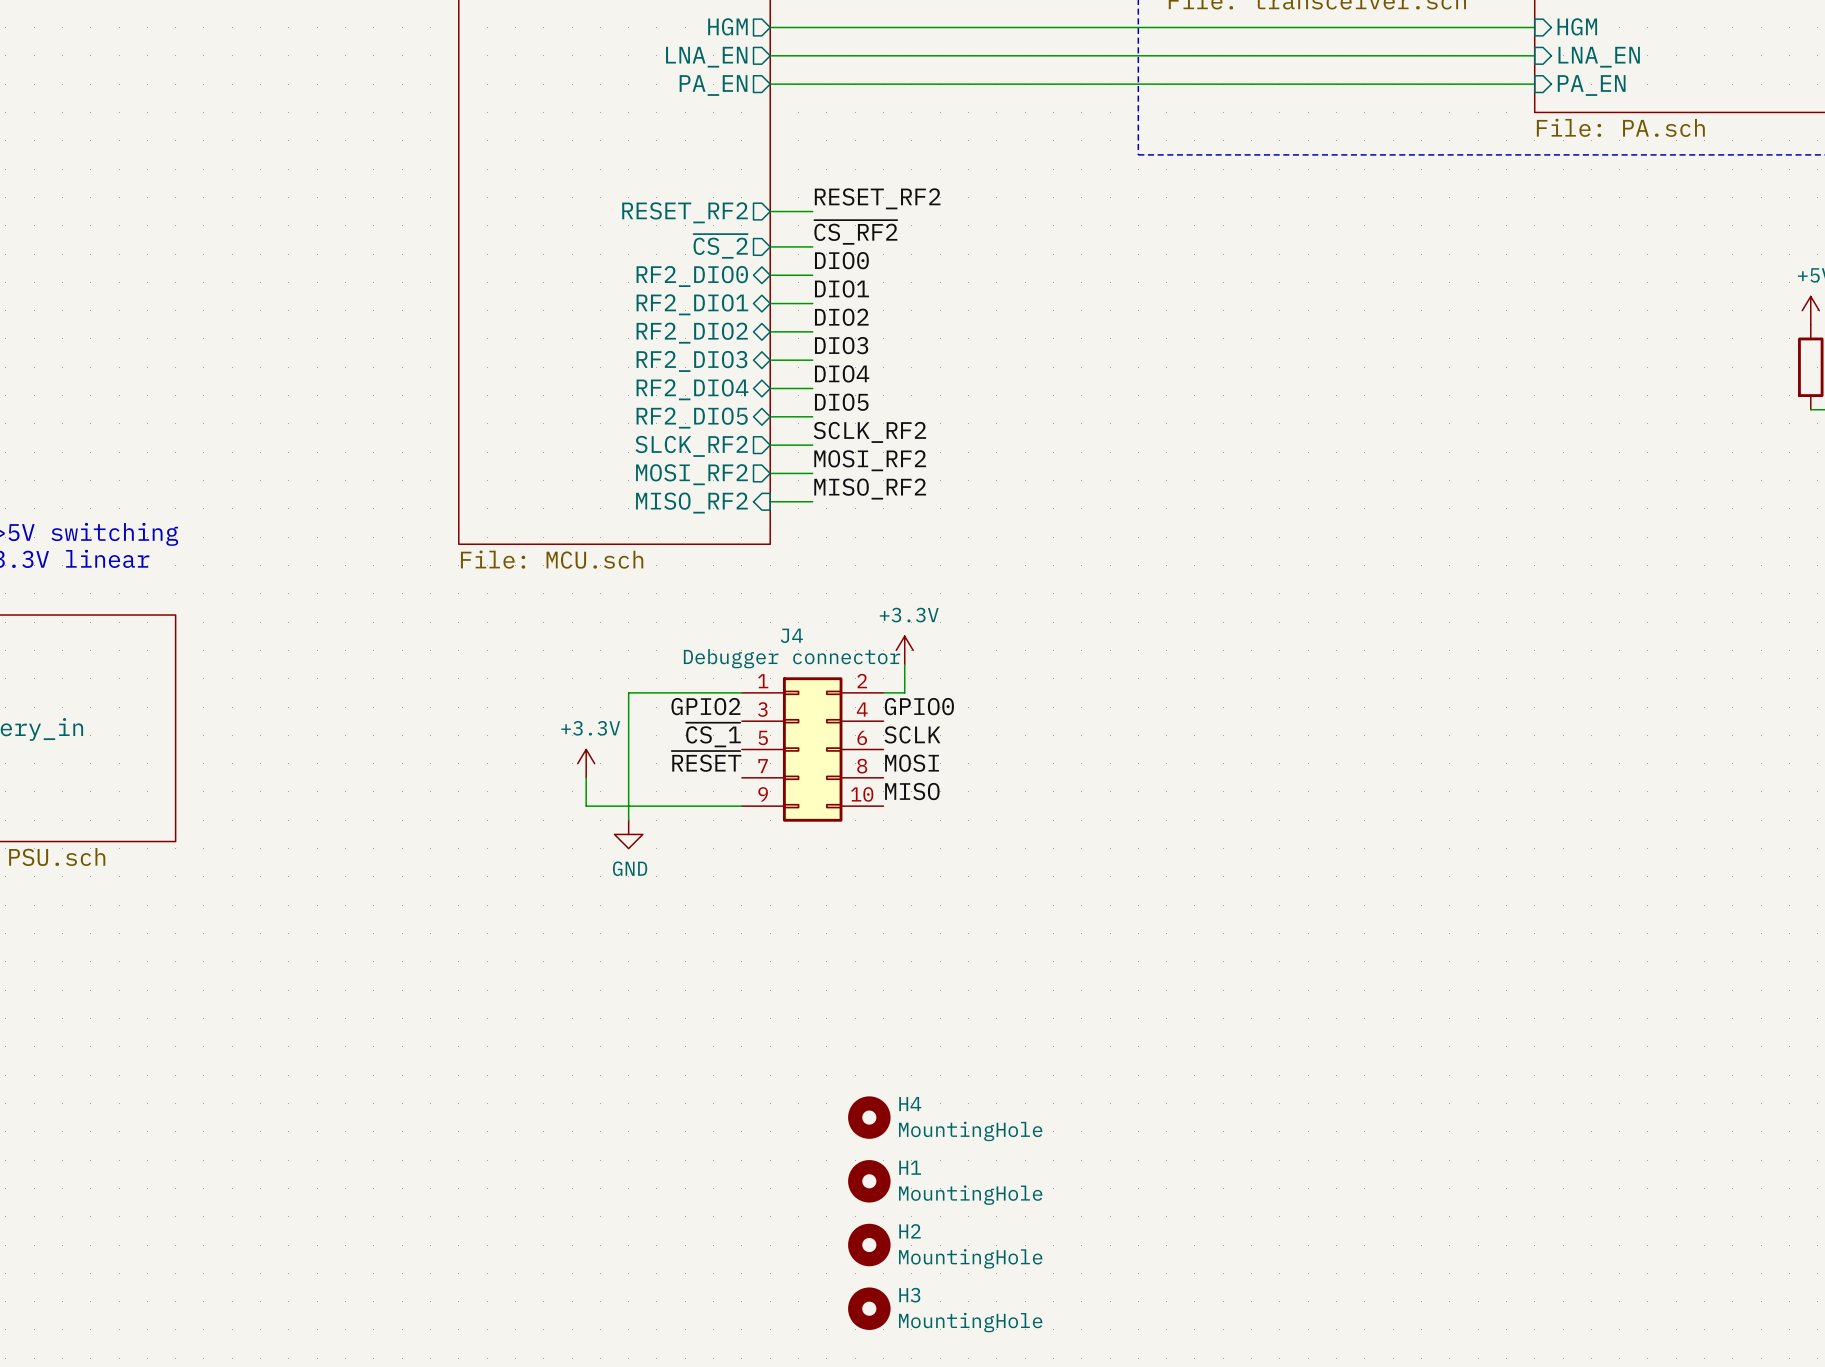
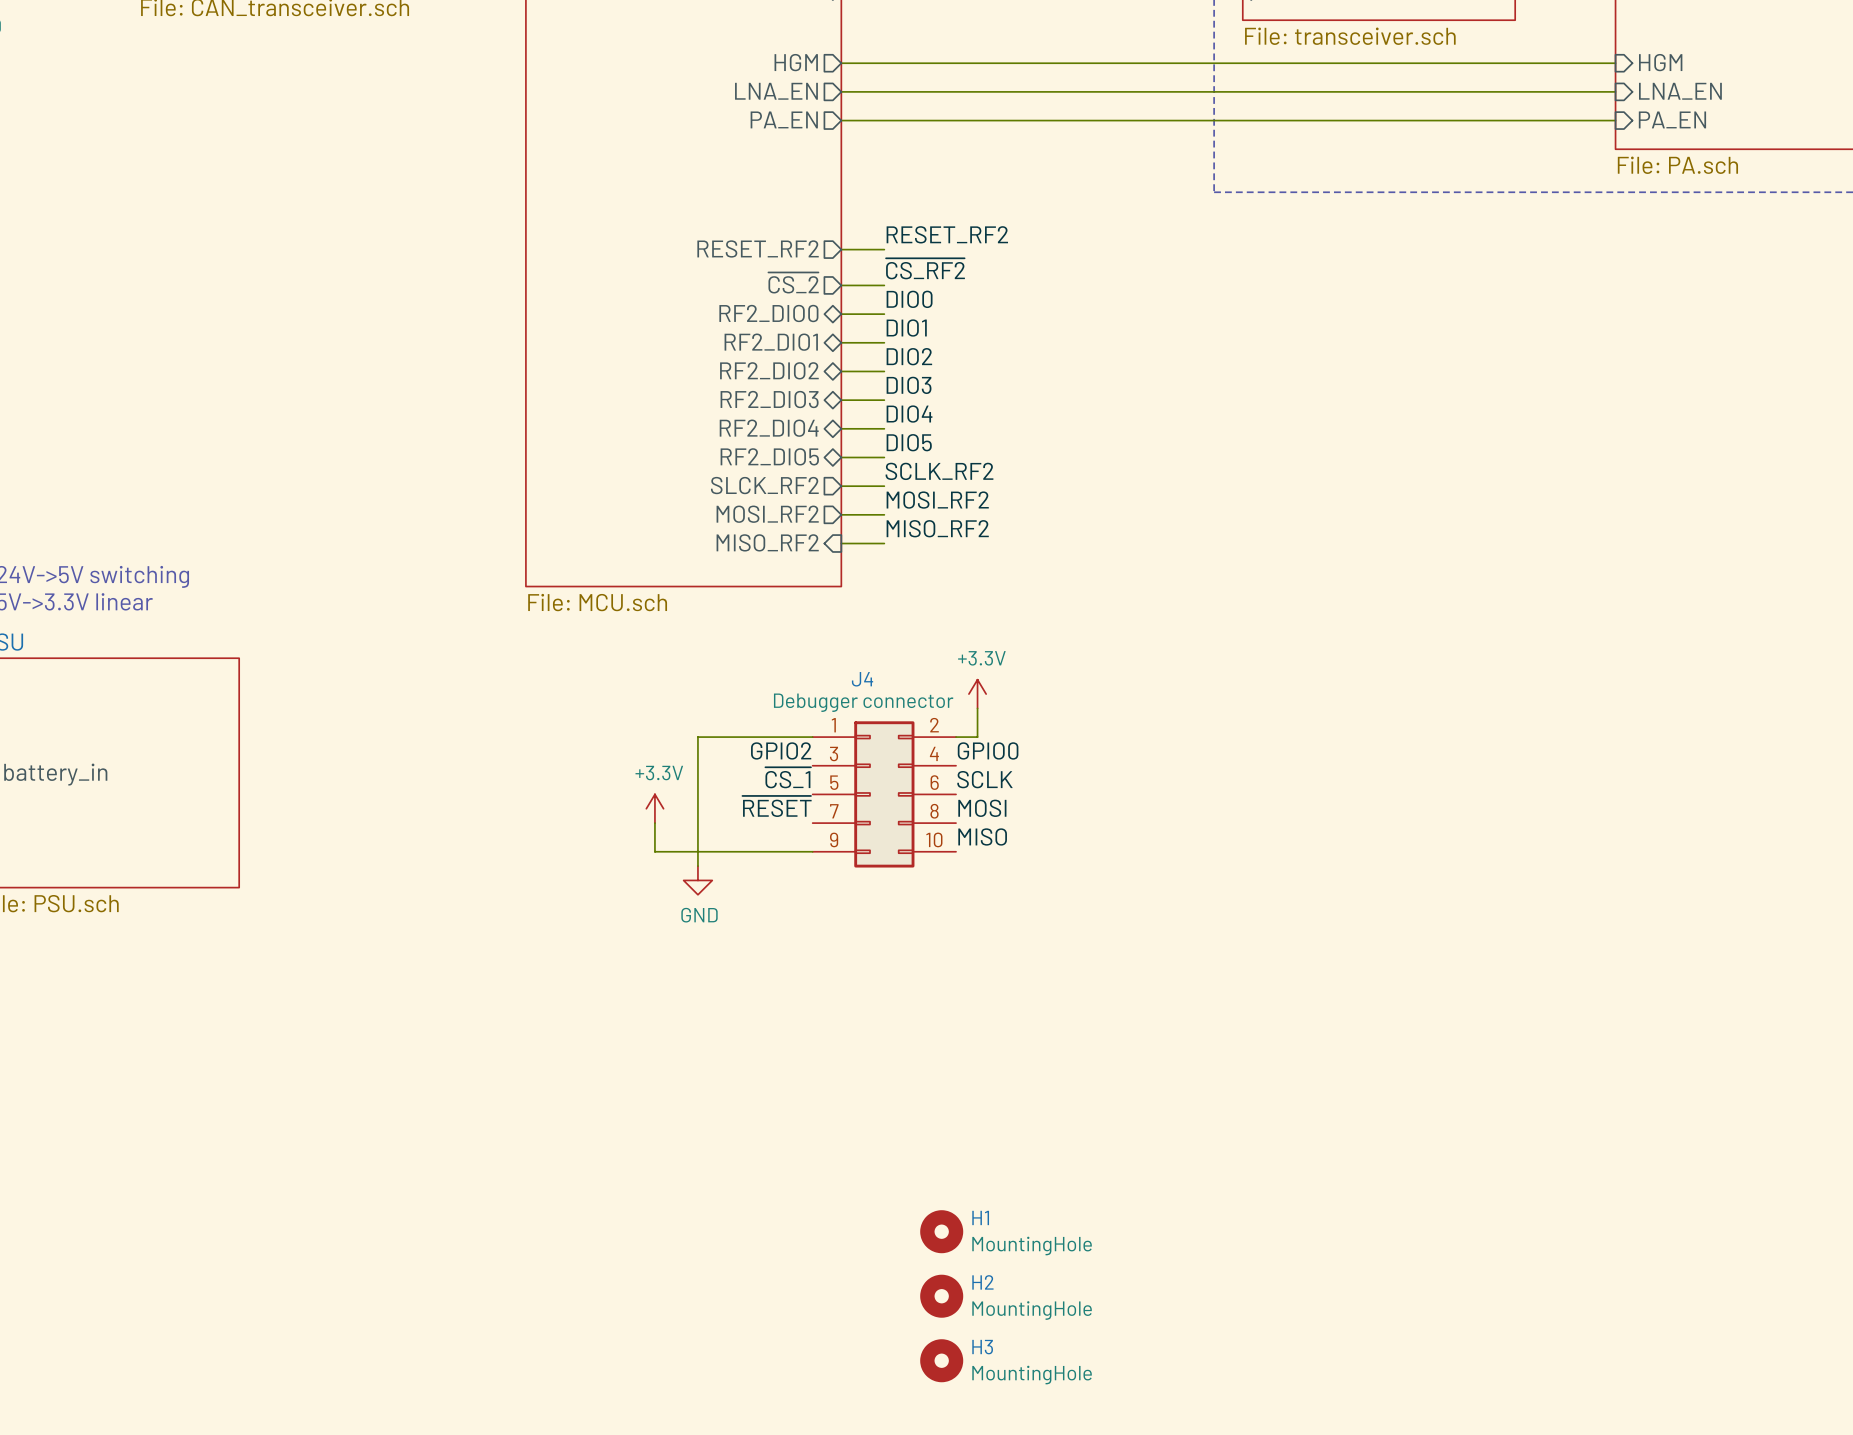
H4: MountingHole (869, 1117) -> none

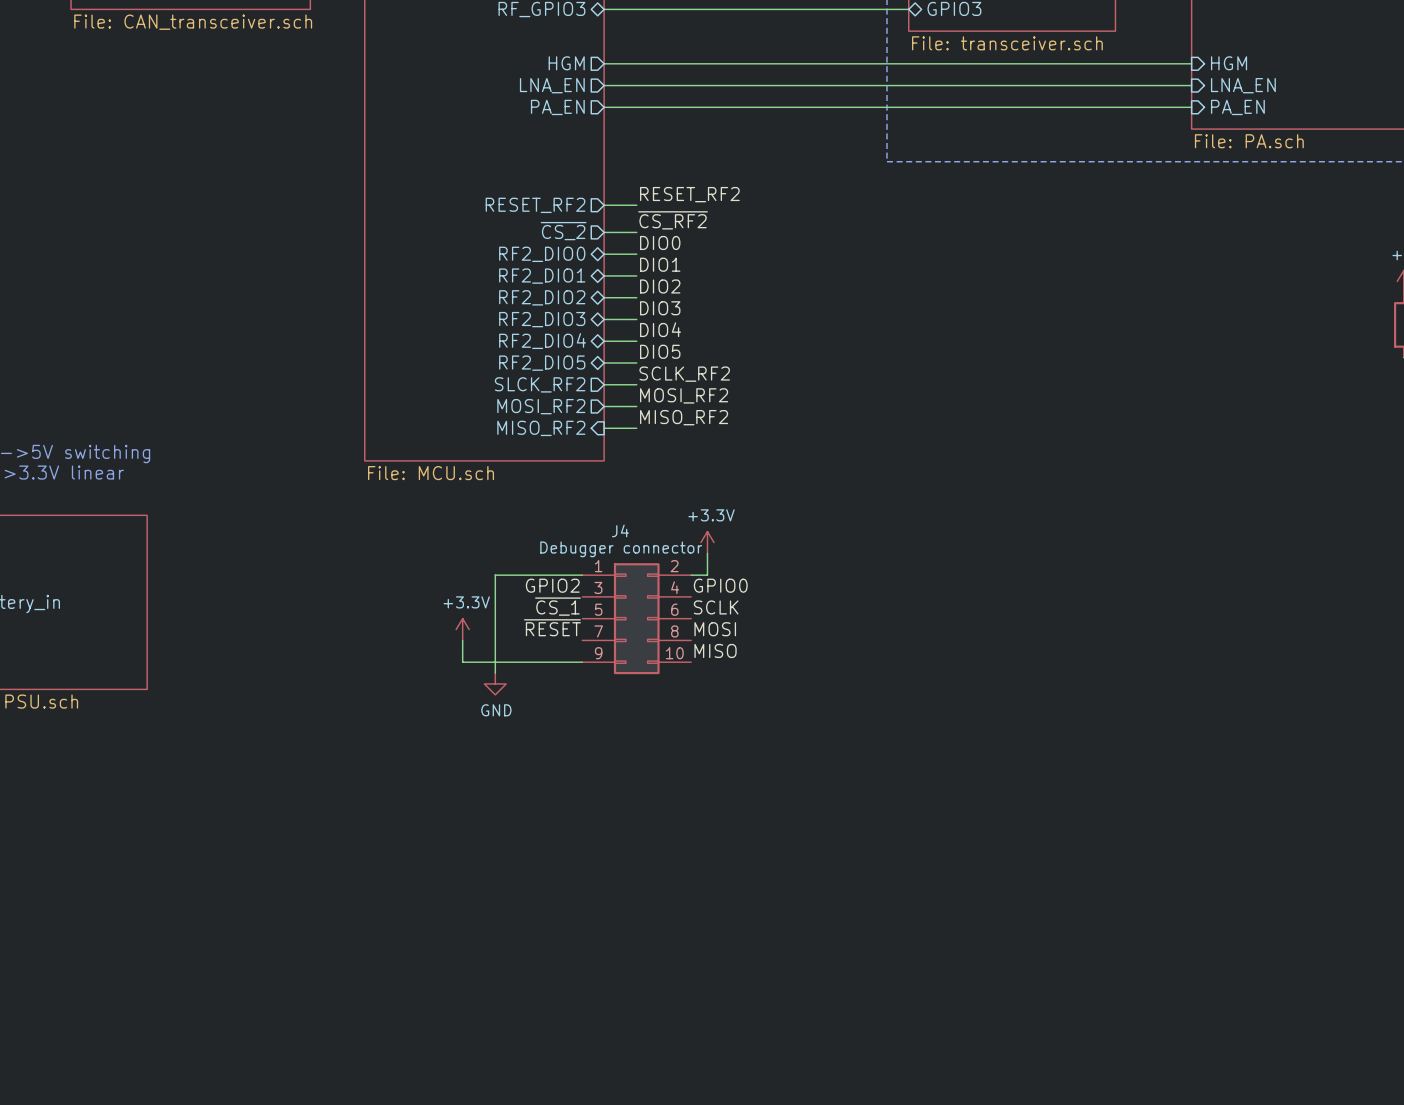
H1: MountingHole (941, 1231) -> none
H2: MountingHole (941, 1296) -> none
H3: MountingHole (941, 1360) -> none

